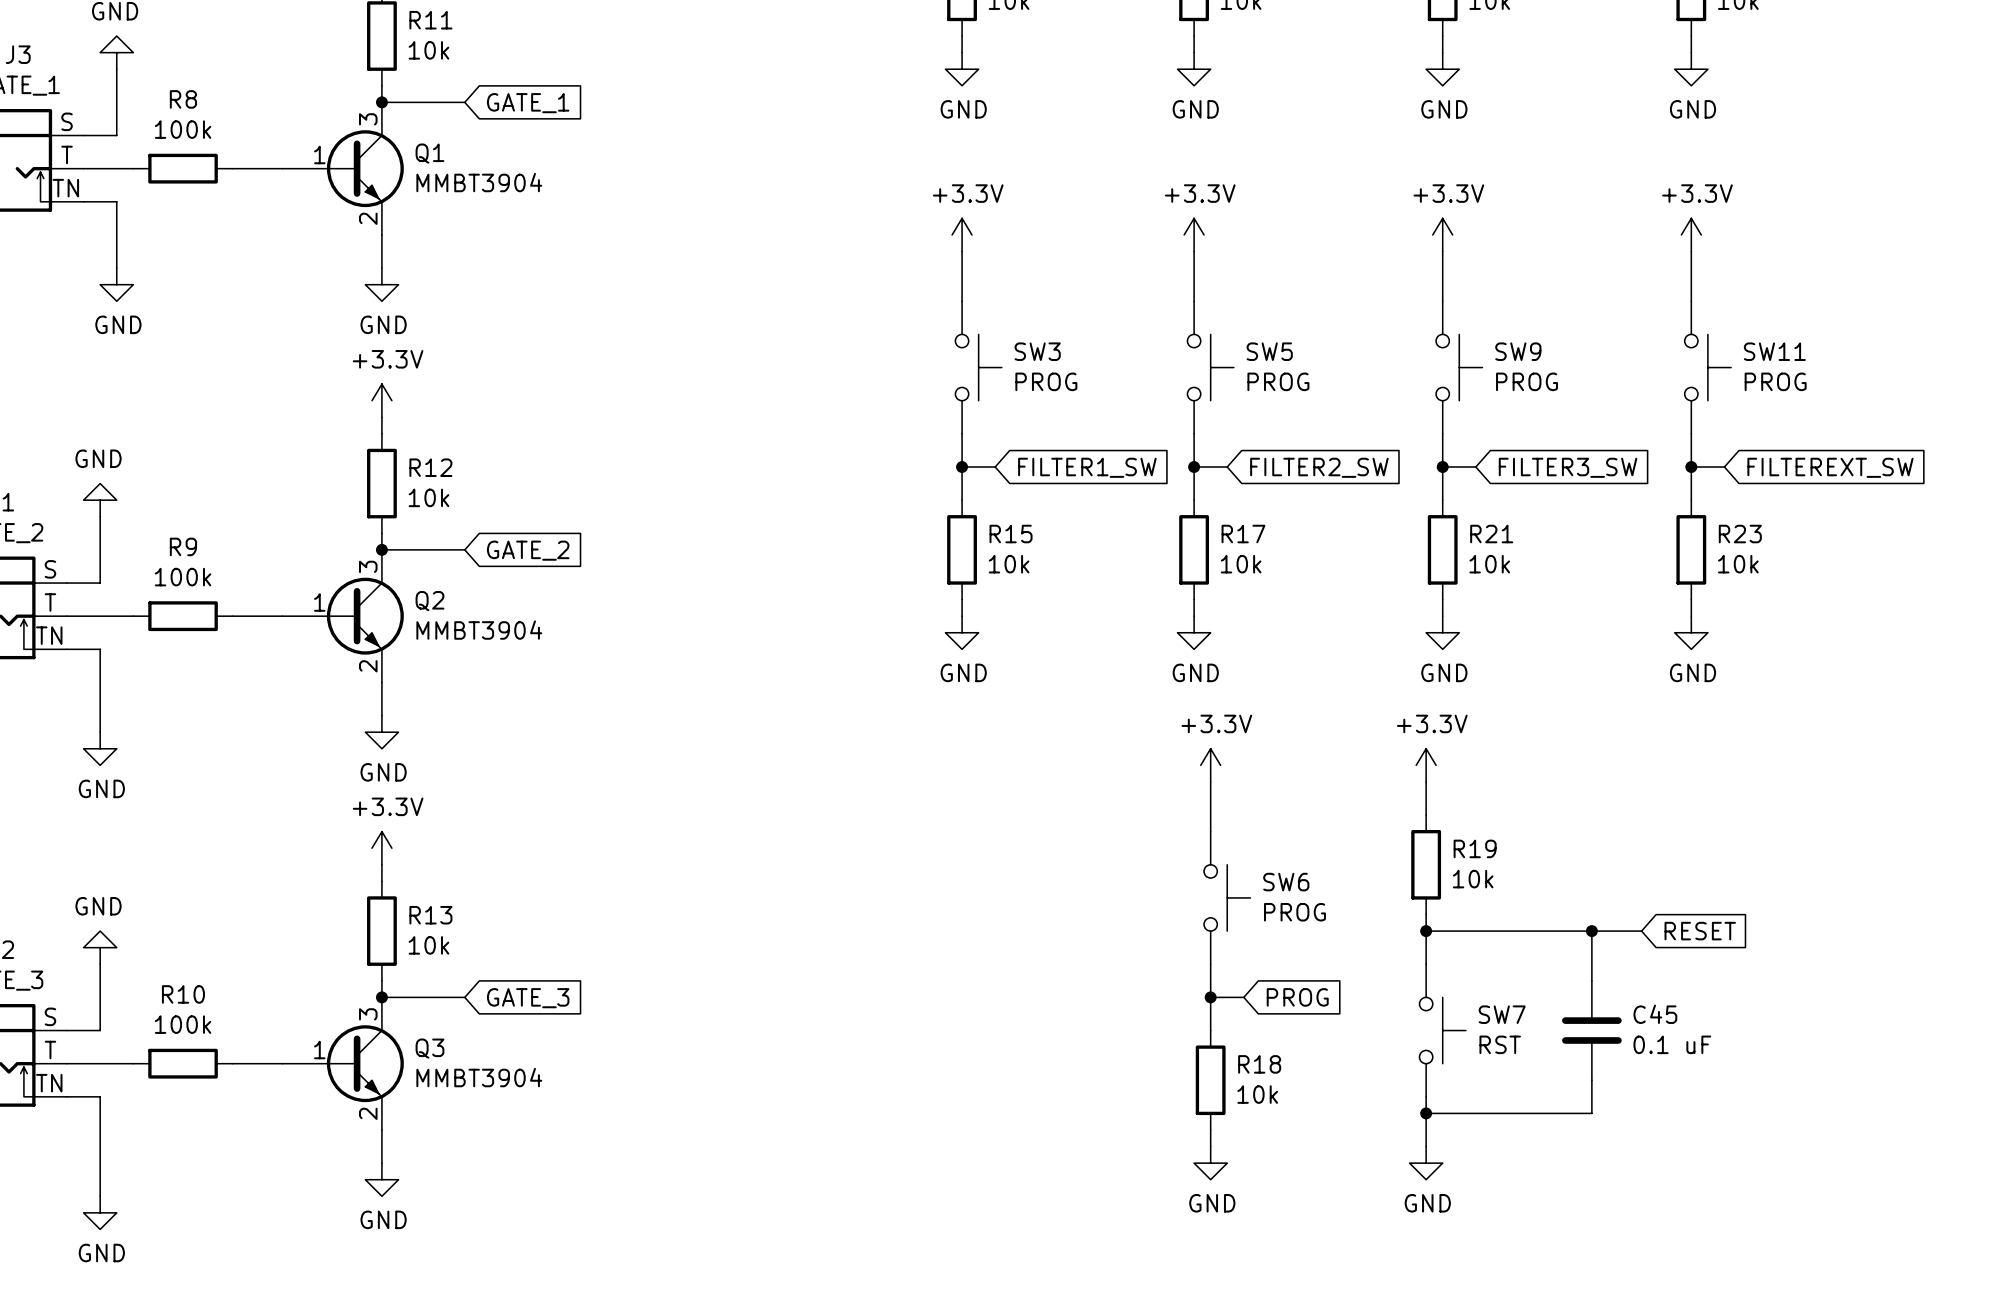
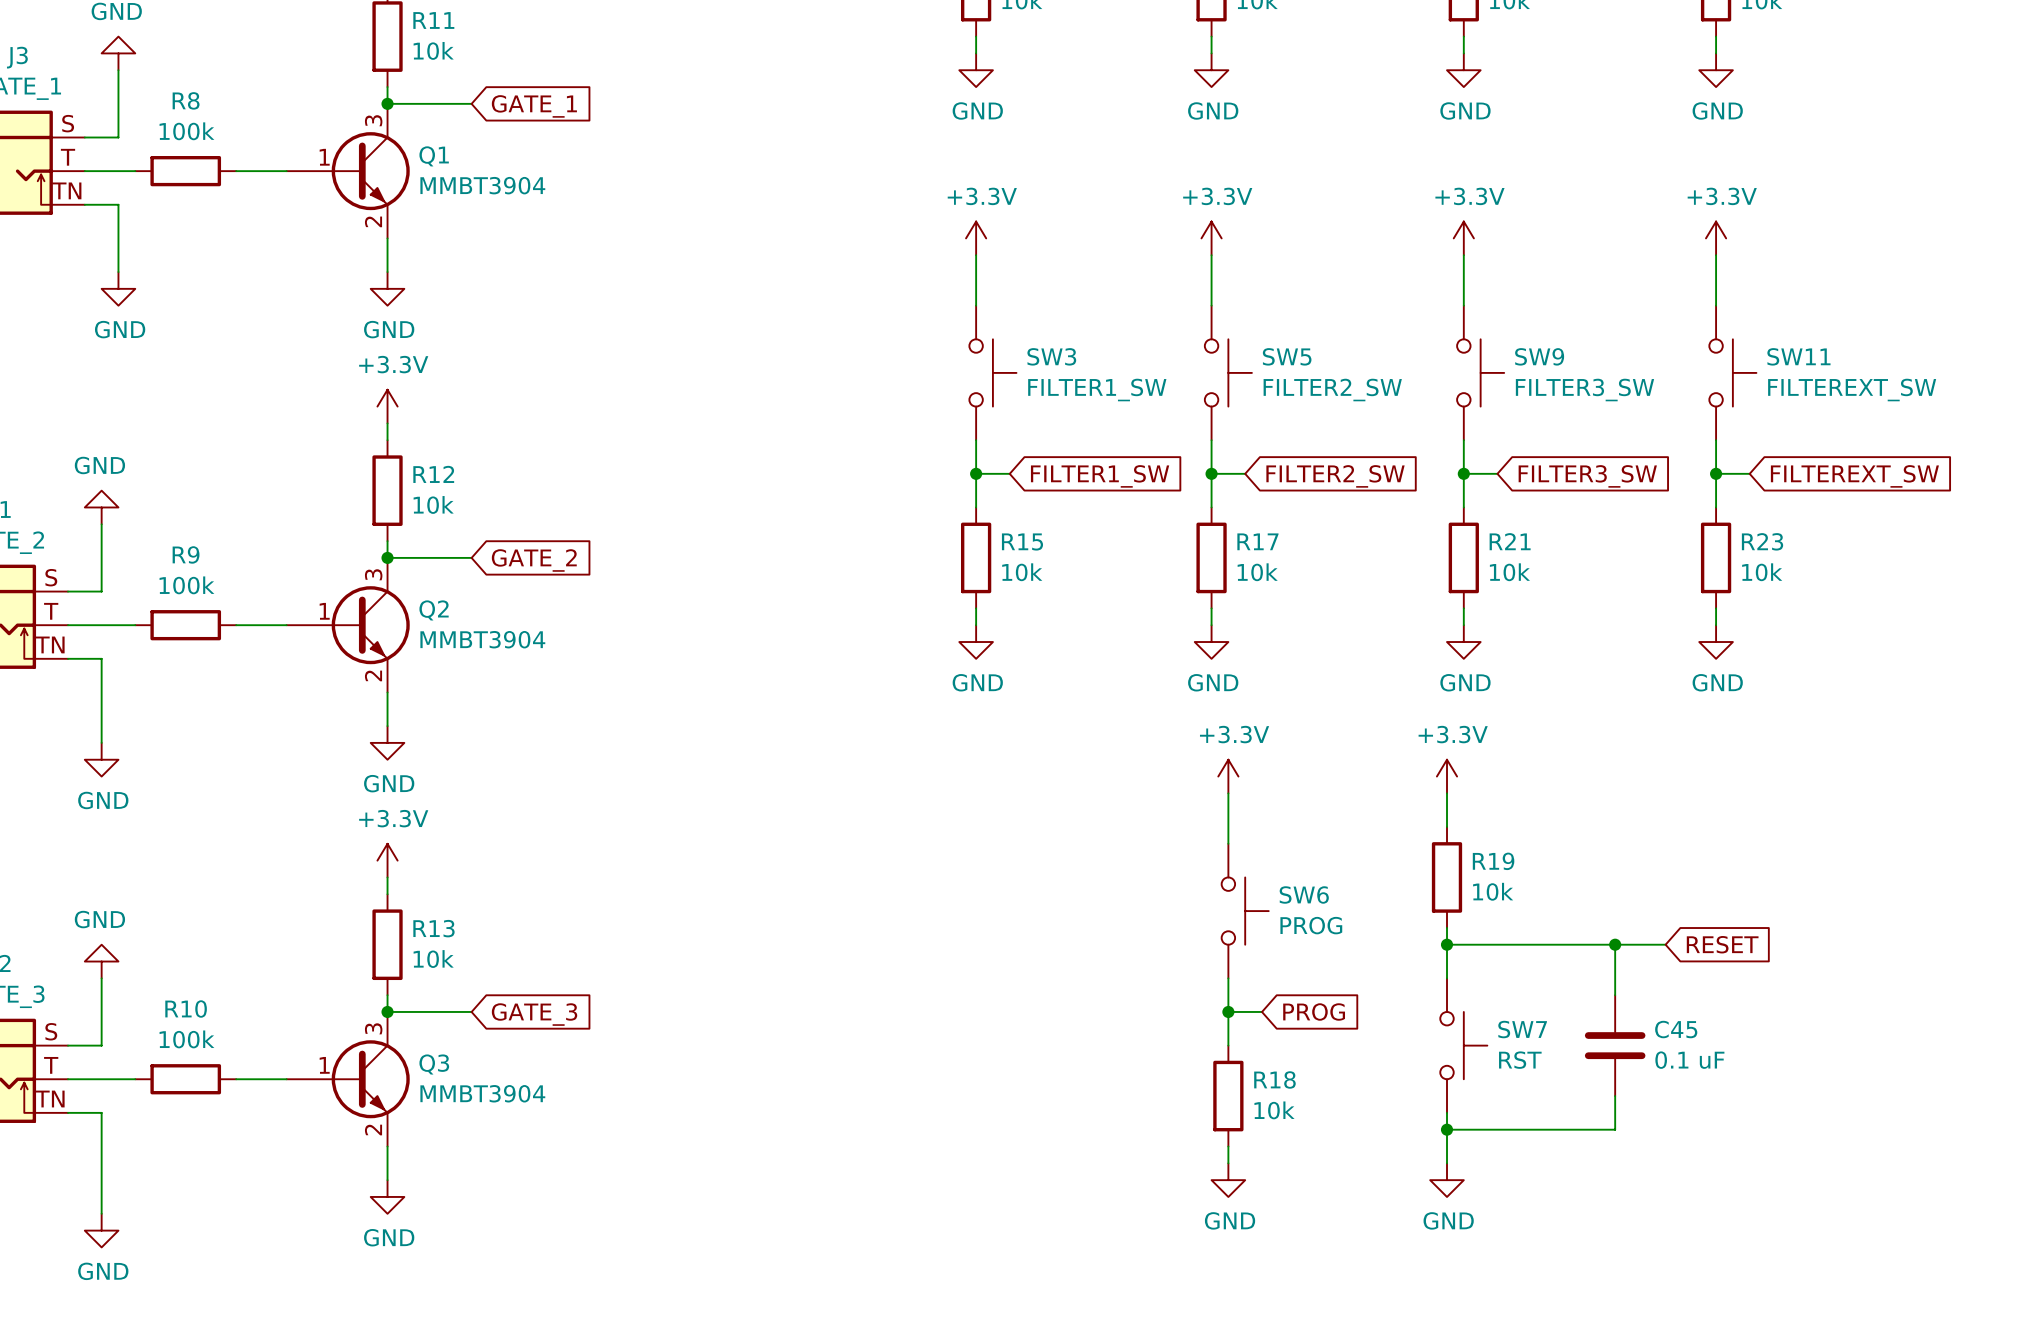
SW3 value: PROG (1046, 381) -> FILTER1_SW (1097, 390)
SW5 value: PROG (1278, 381) -> FILTER2_SW (1332, 390)
SW9 value: PROG (1527, 381) -> FILTER3_SW (1584, 390)
SW11 value: PROG (1775, 381) -> FILTEREXT_SW (1852, 390)

